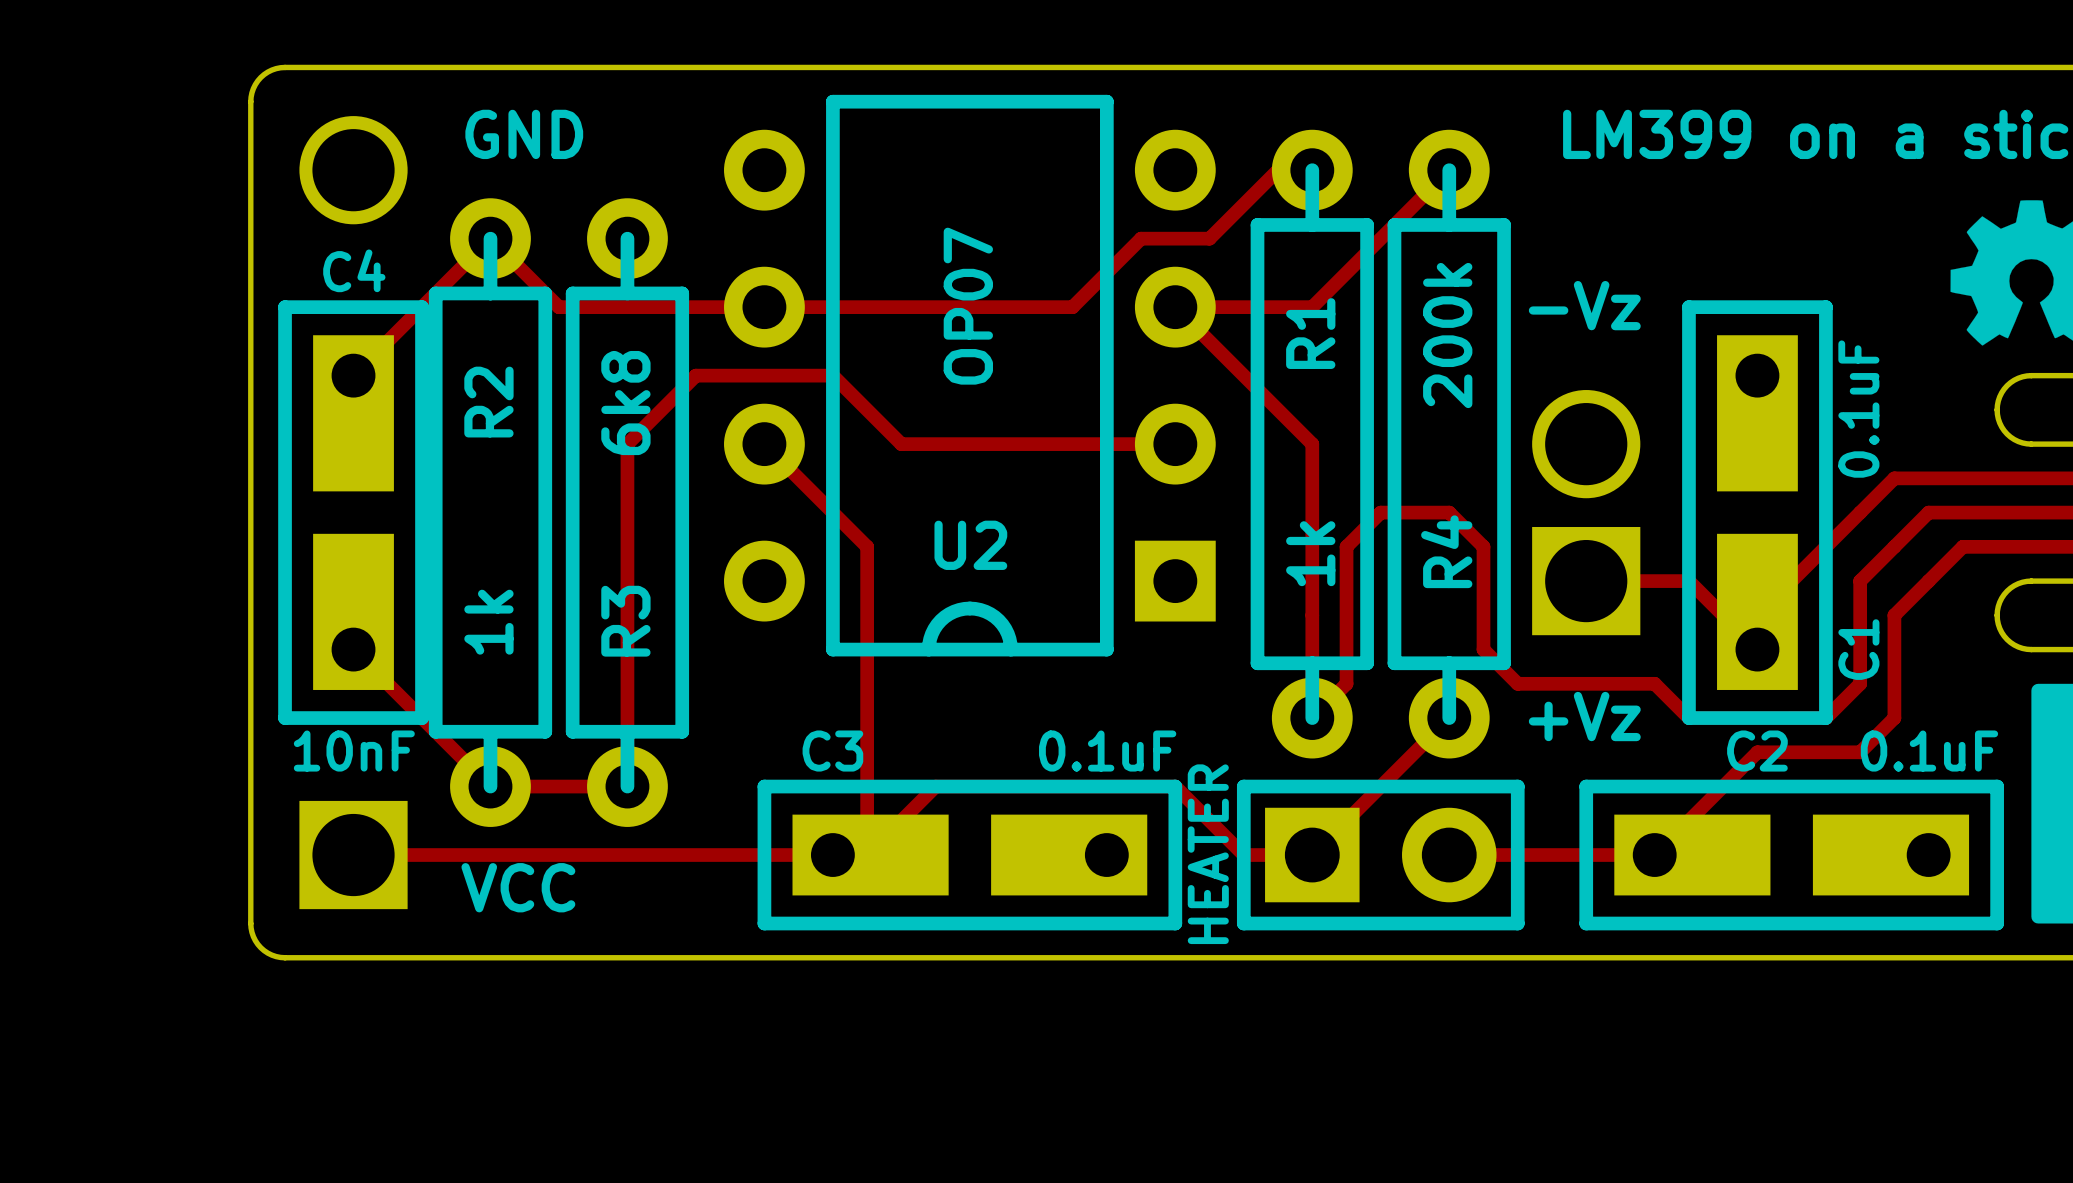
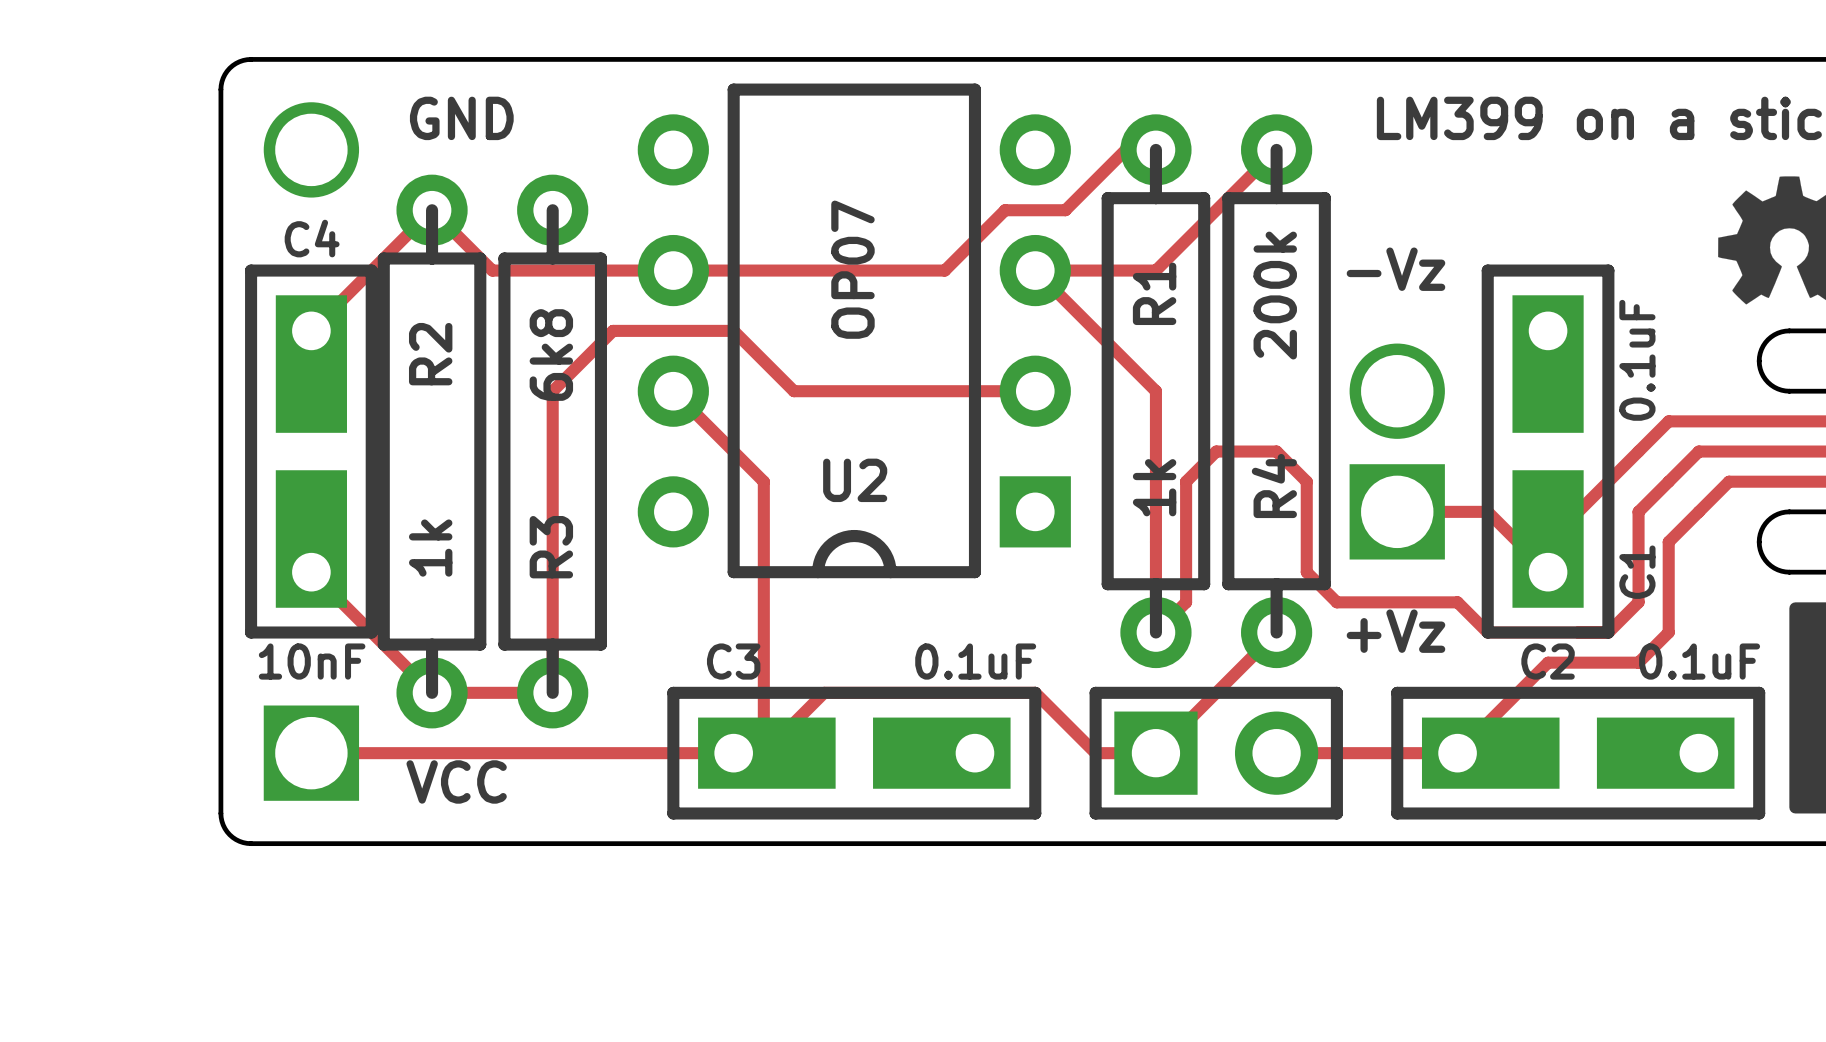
text: HEATER (1208, 854) -> none

